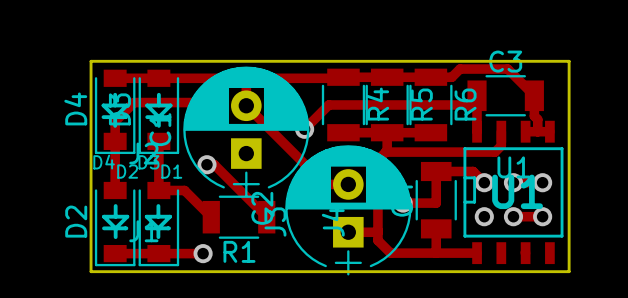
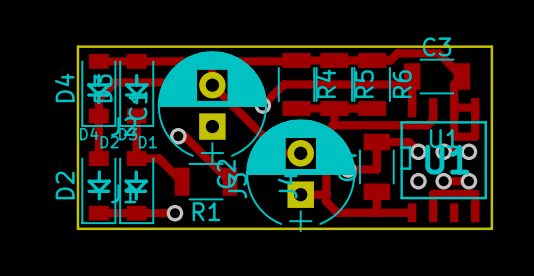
track: (534, 95) (534, 116) (537, 119) (537, 131) -> (461, 76) (454, 84) (455, 136) (475, 136) (475, 107)
track: none -> (433, 212) (433, 193) (475, 193) (475, 212)

